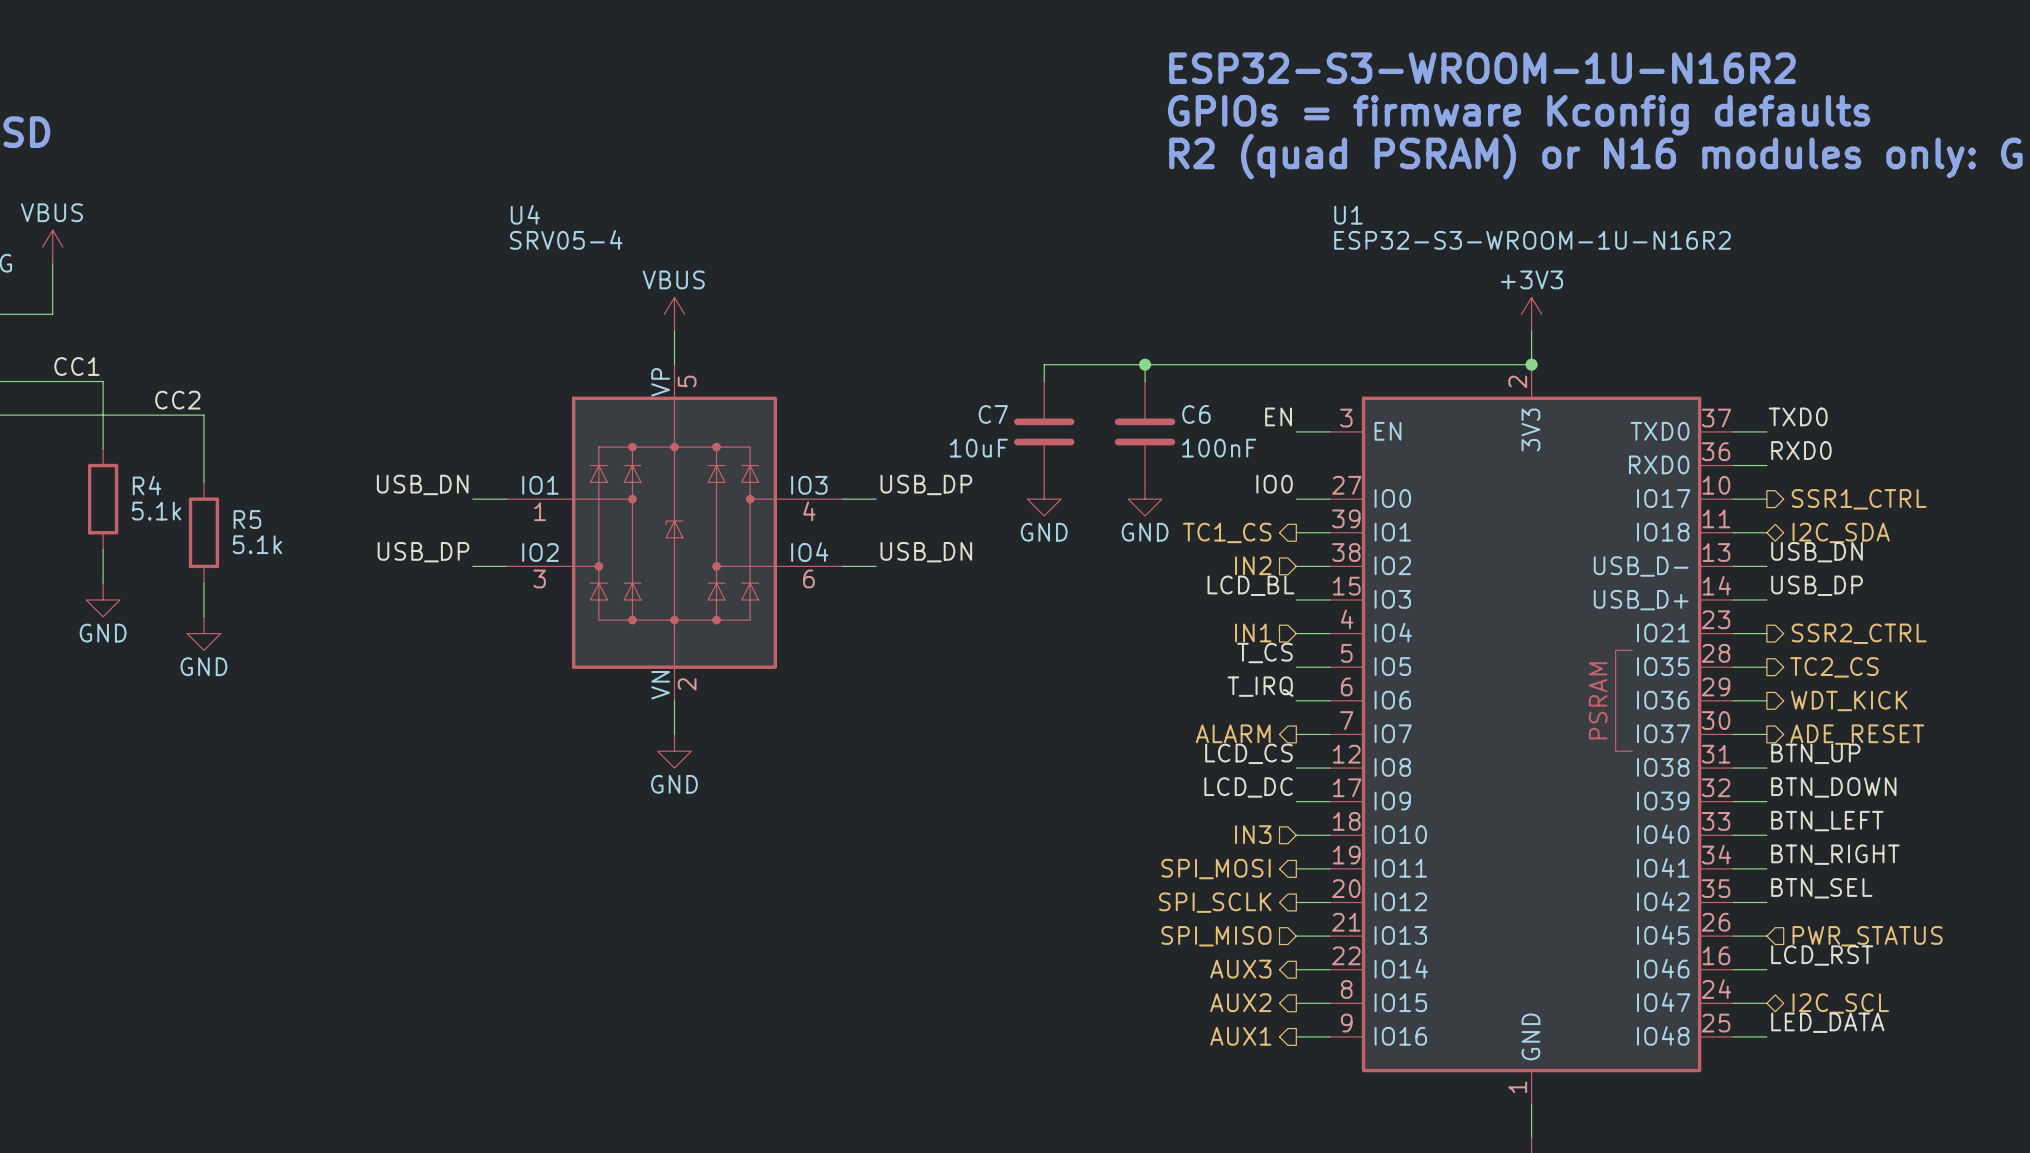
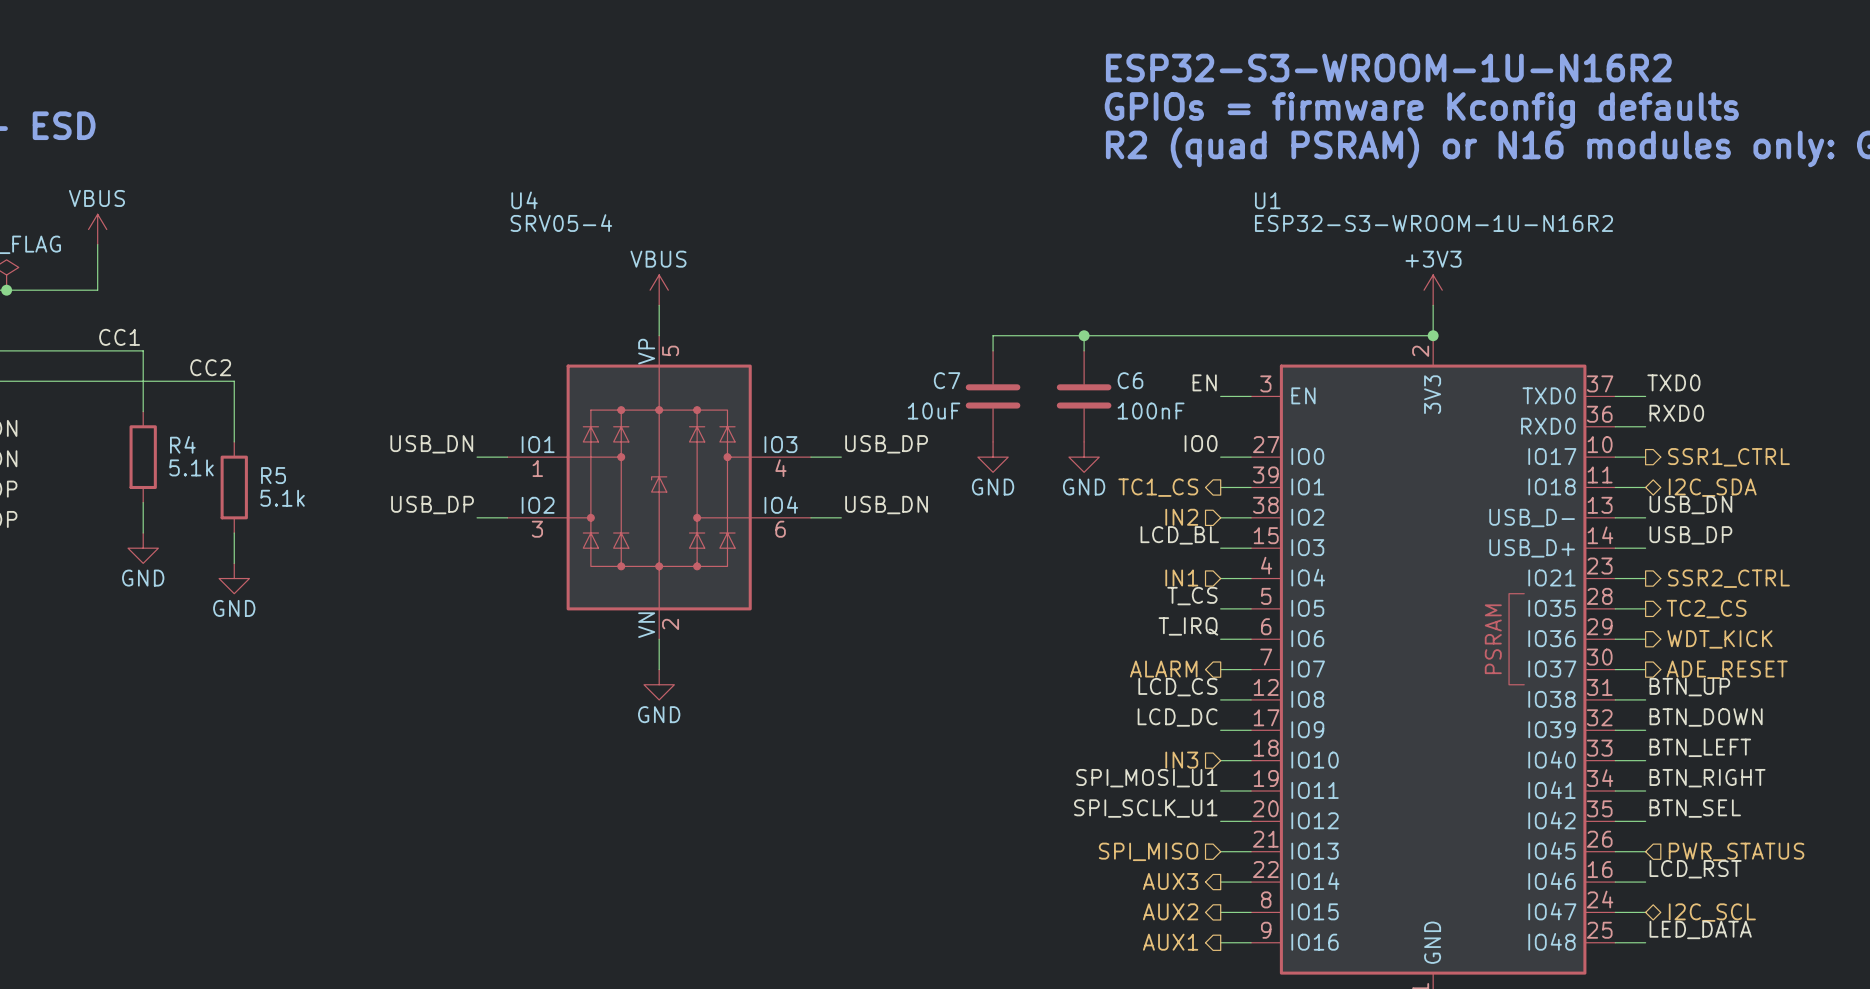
label: none -> SPI_MOSI_U1 (1146, 778)
hierarchical label: SPI_MOSI (1216, 869) -> none
label: none -> SPI_SCLK_U1 (1145, 808)
hierarchical label: SPI_SCLK (1215, 902) -> none

